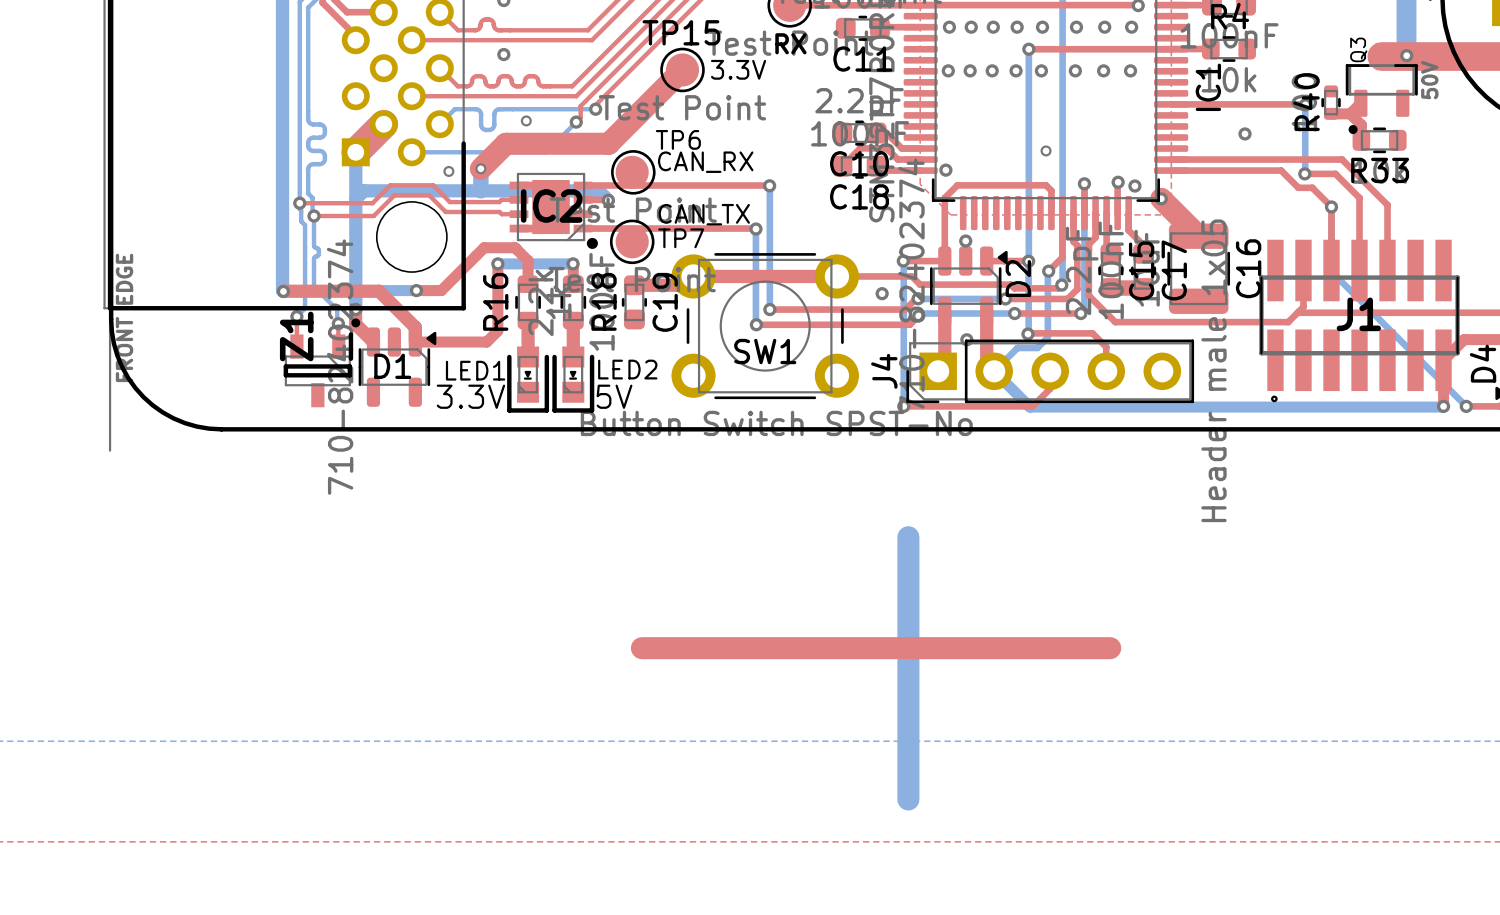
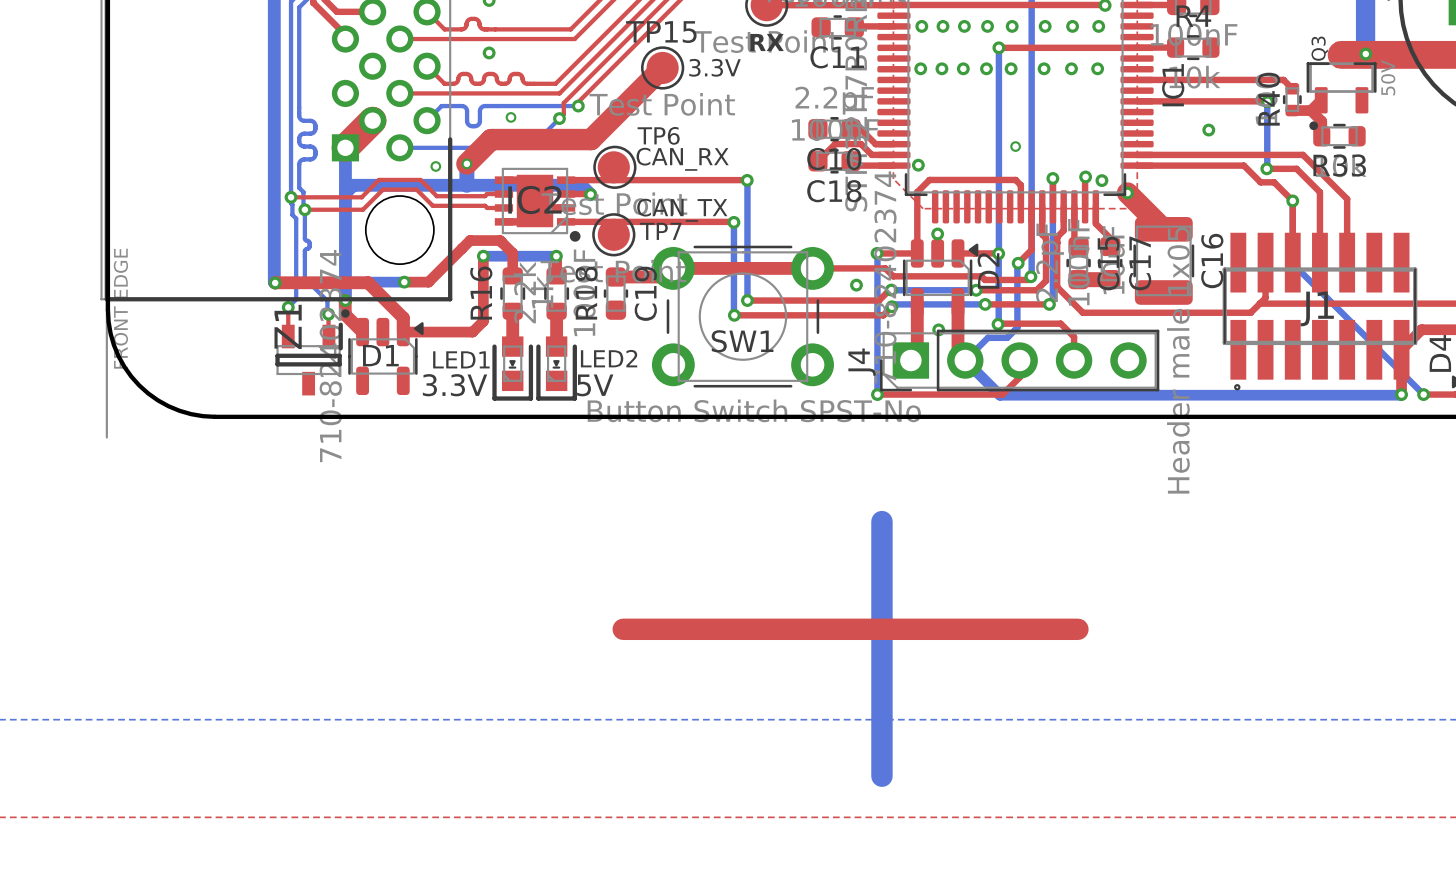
top track: none -> (1137, 79) (1283, 79) (1292, 88)

